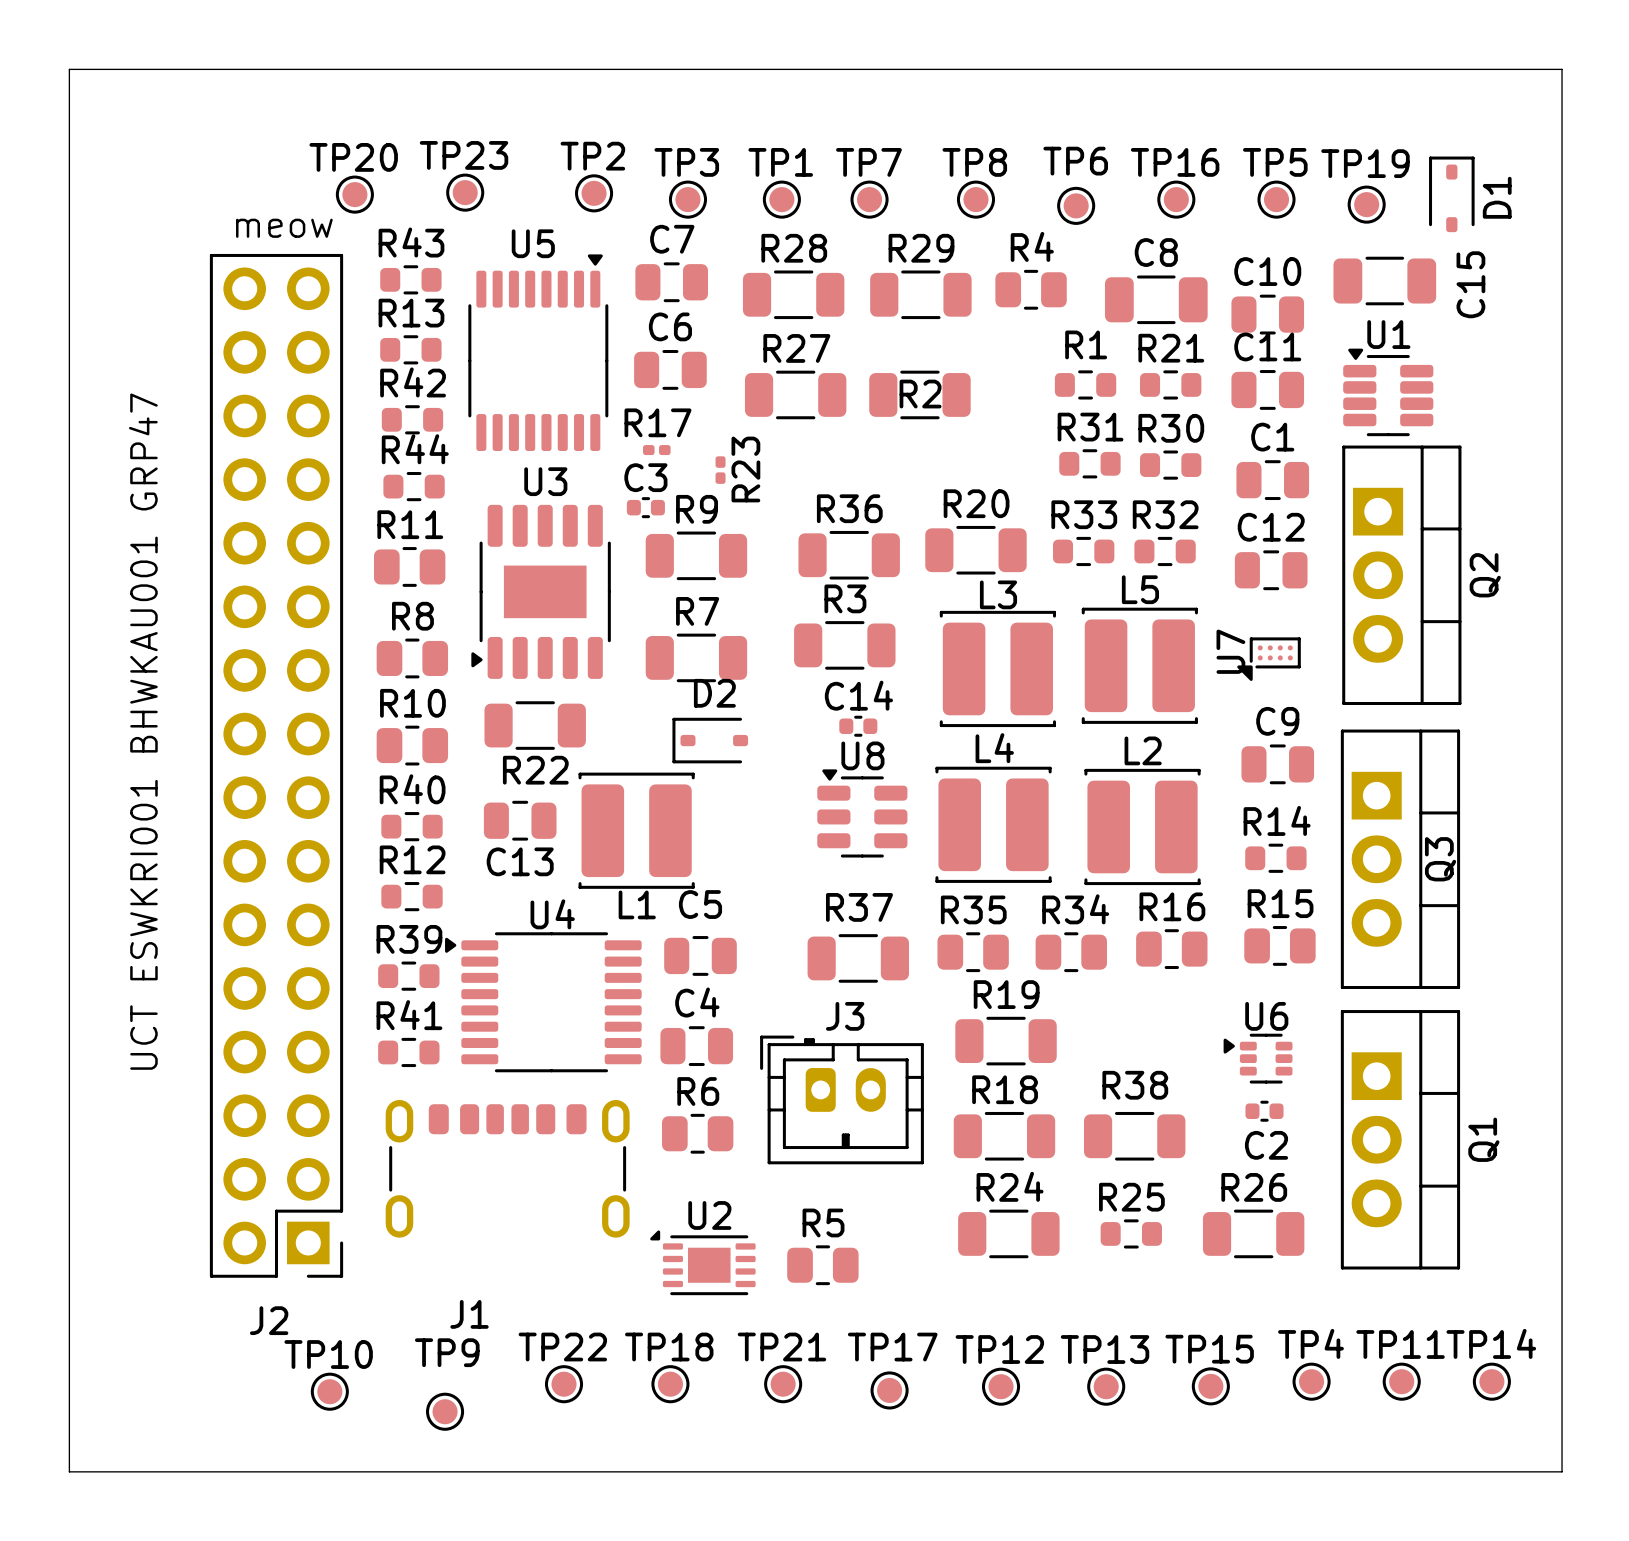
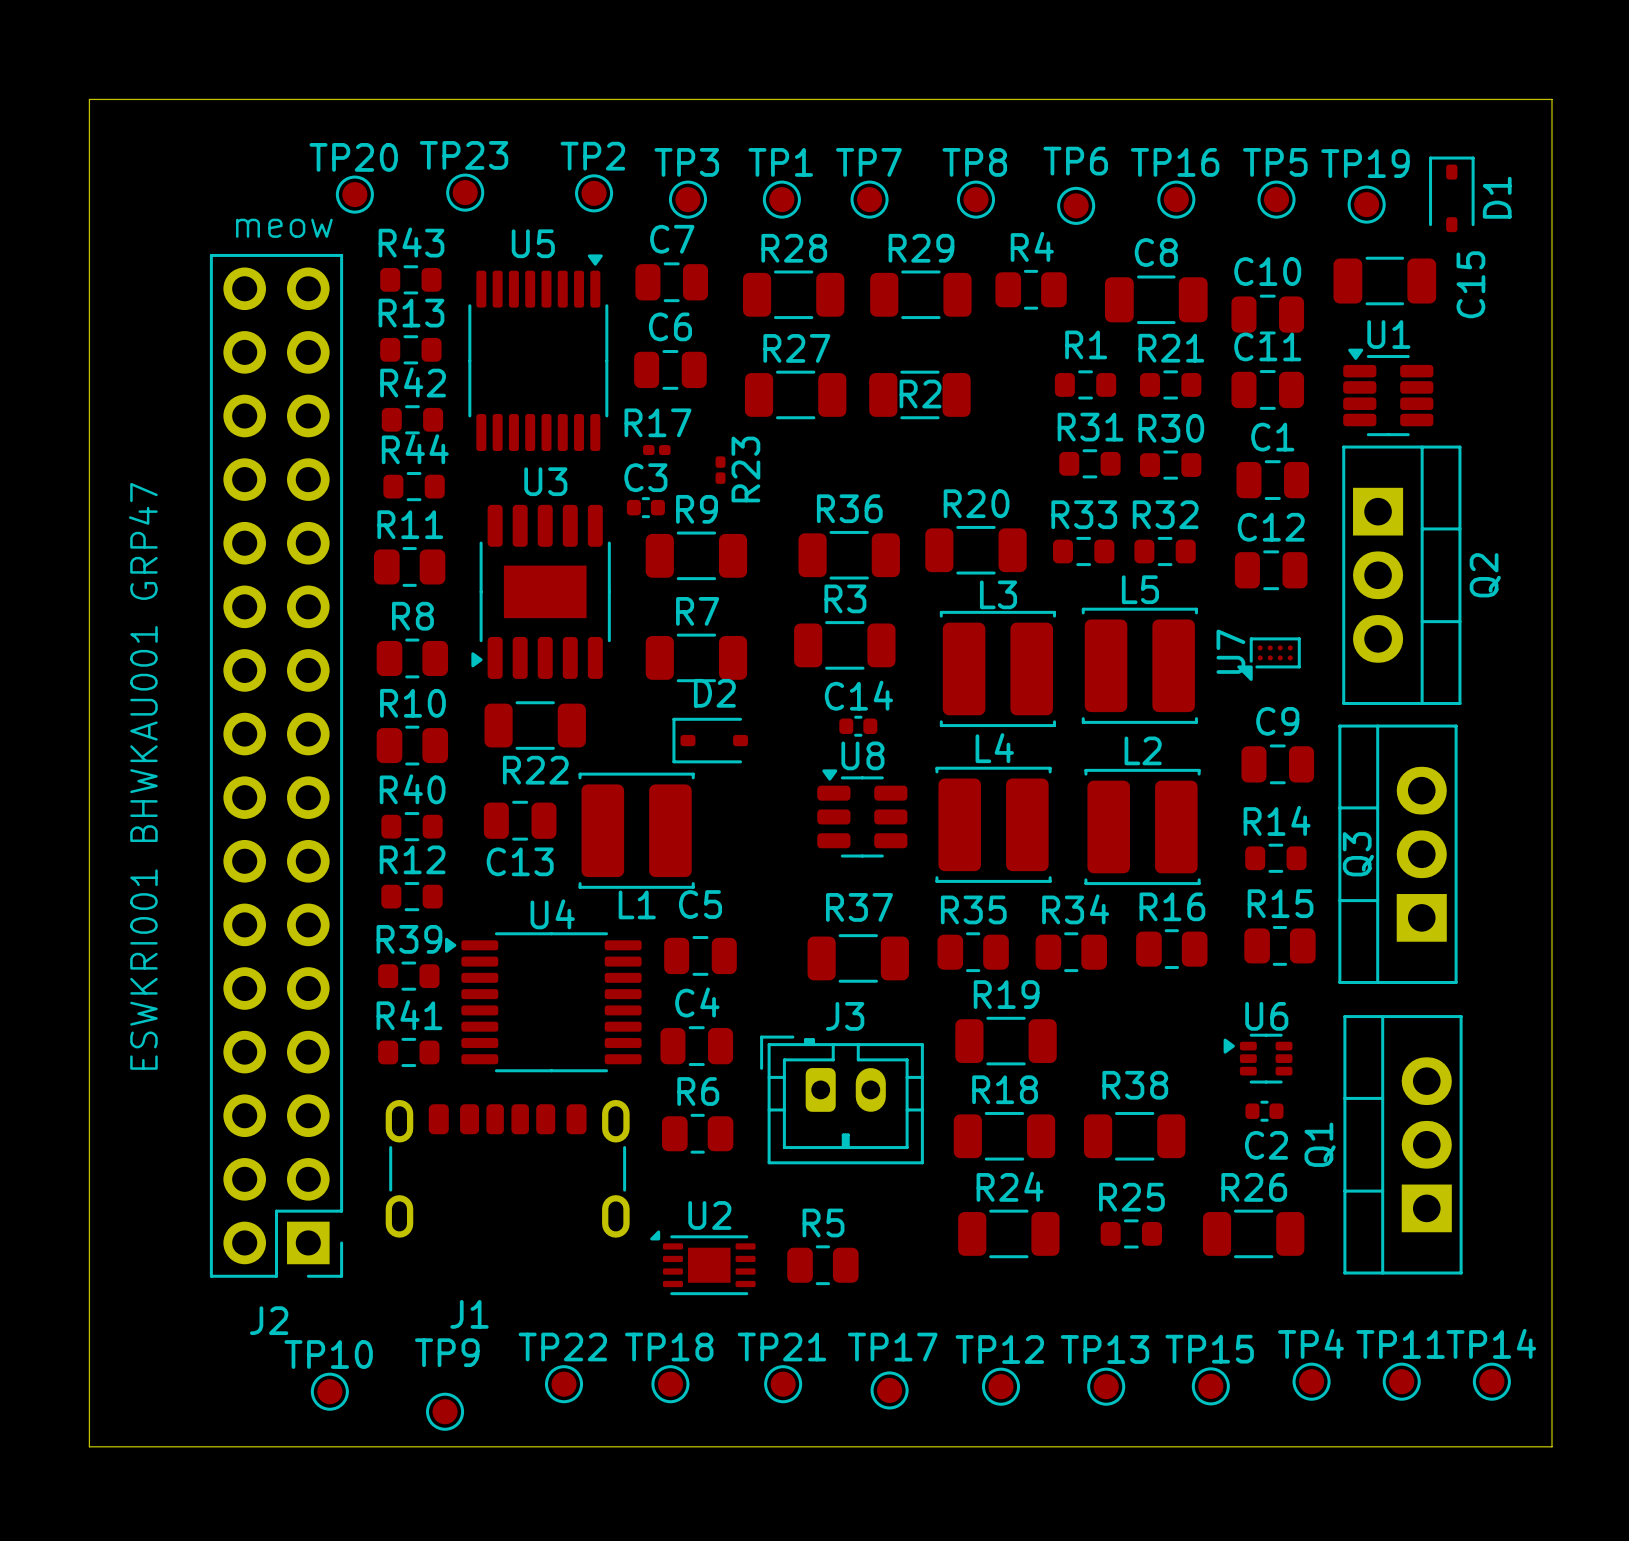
board edge: (69, 69) (1562, 69) (1562, 1471) (69, 1471) (69, 69) -> (89, 99) (89, 1446) (1551, 1446) (1551, 99) (89, 99)
text: UCT ESWKRI001 BHWKAU001 GRP47 (143, 731) -> ESWKRI001 BHWKAU001 GRP47 (143, 776)
Q3 rotation: 0° (1400, 859) -> 180° (1397, 854)
Q1 rotation: 0° (1400, 1139) -> 180° (1402, 1144)

